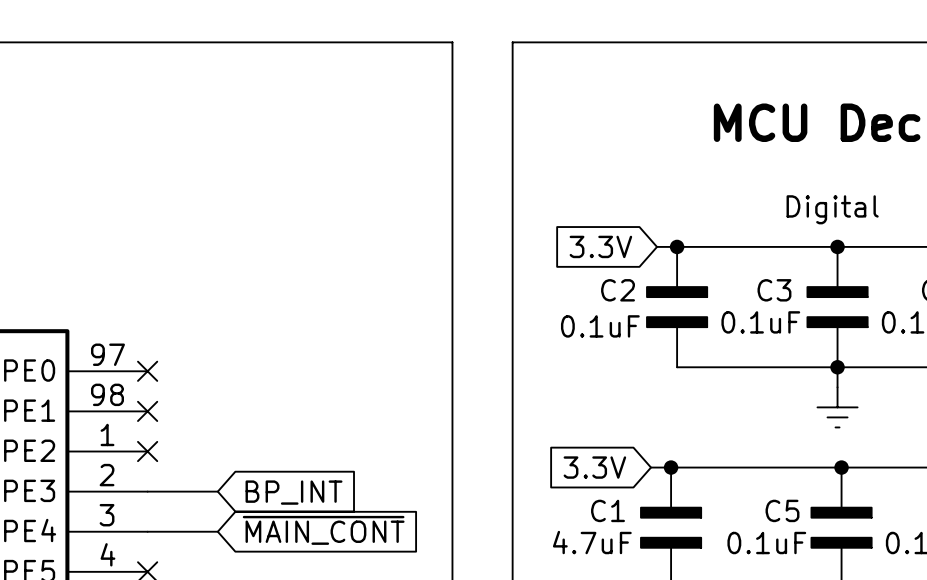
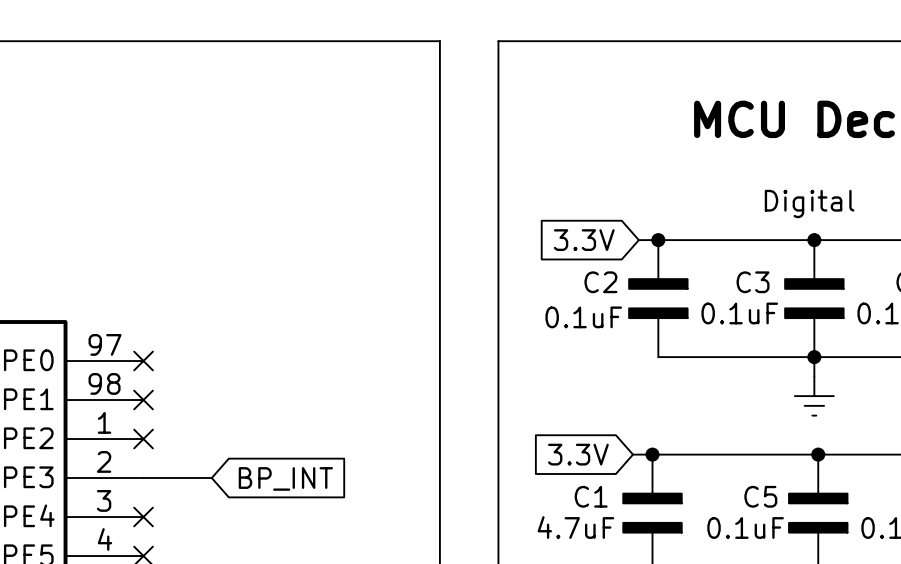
global label: ~{MAIN_CONT} (323, 530) -> none
wire: (147, 531) (217, 531) -> none
no-connect mark: none -> (143, 517)

